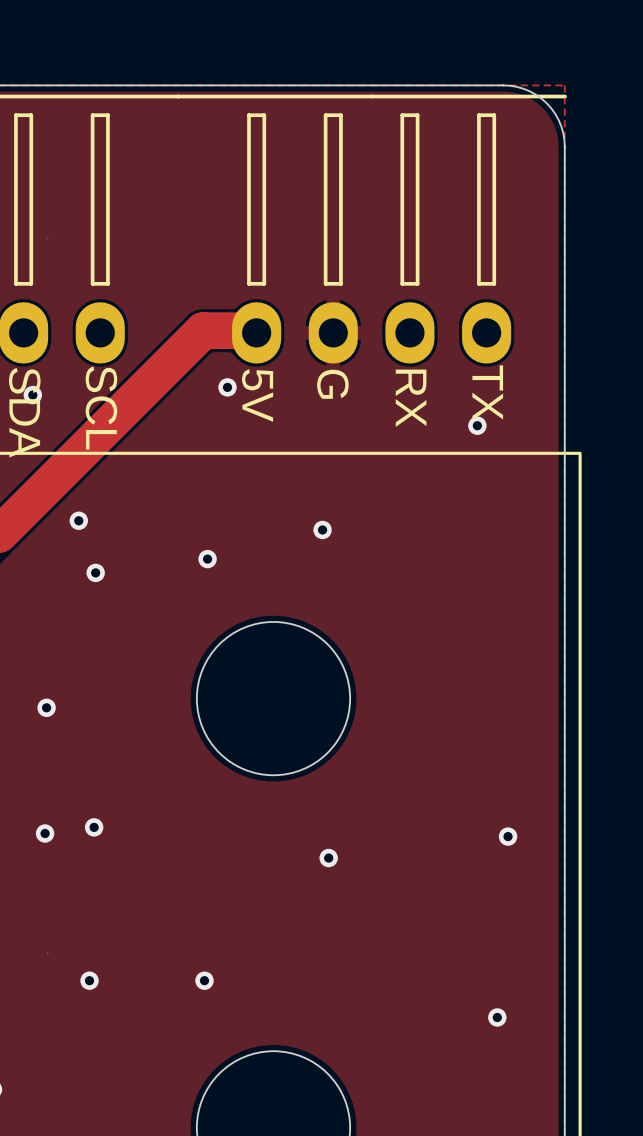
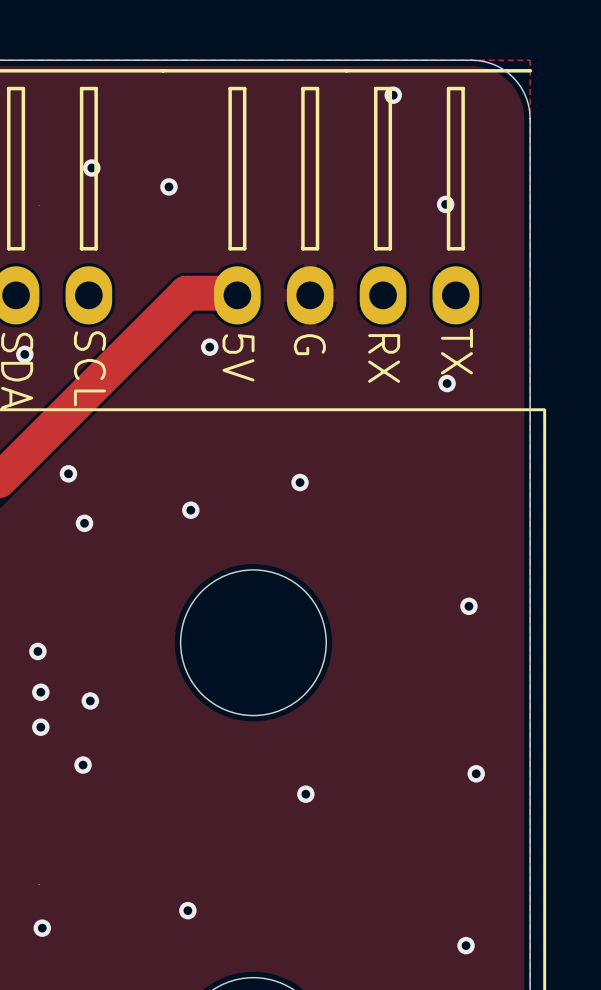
via: none -> (393, 95)
via: none -> (91, 168)
via: none -> (168, 186)
via: none -> (445, 204)
via: none -> (468, 606)
via: none -> (40, 692)
via: none -> (90, 700)
via: none -> (40, 727)
via: (45, 833) -> none
via position: (89, 980) -> (42, 928)

